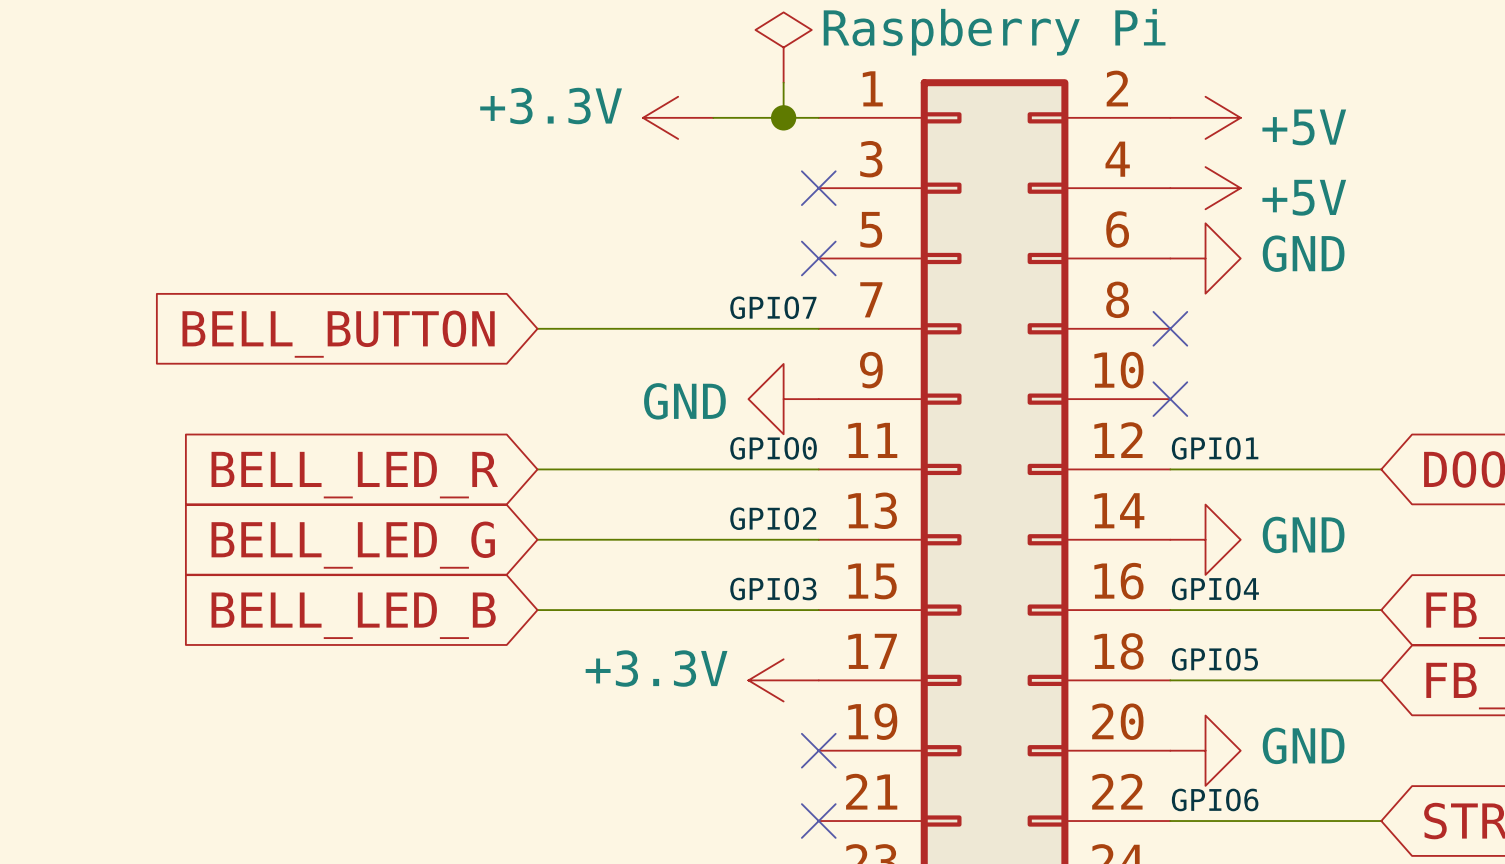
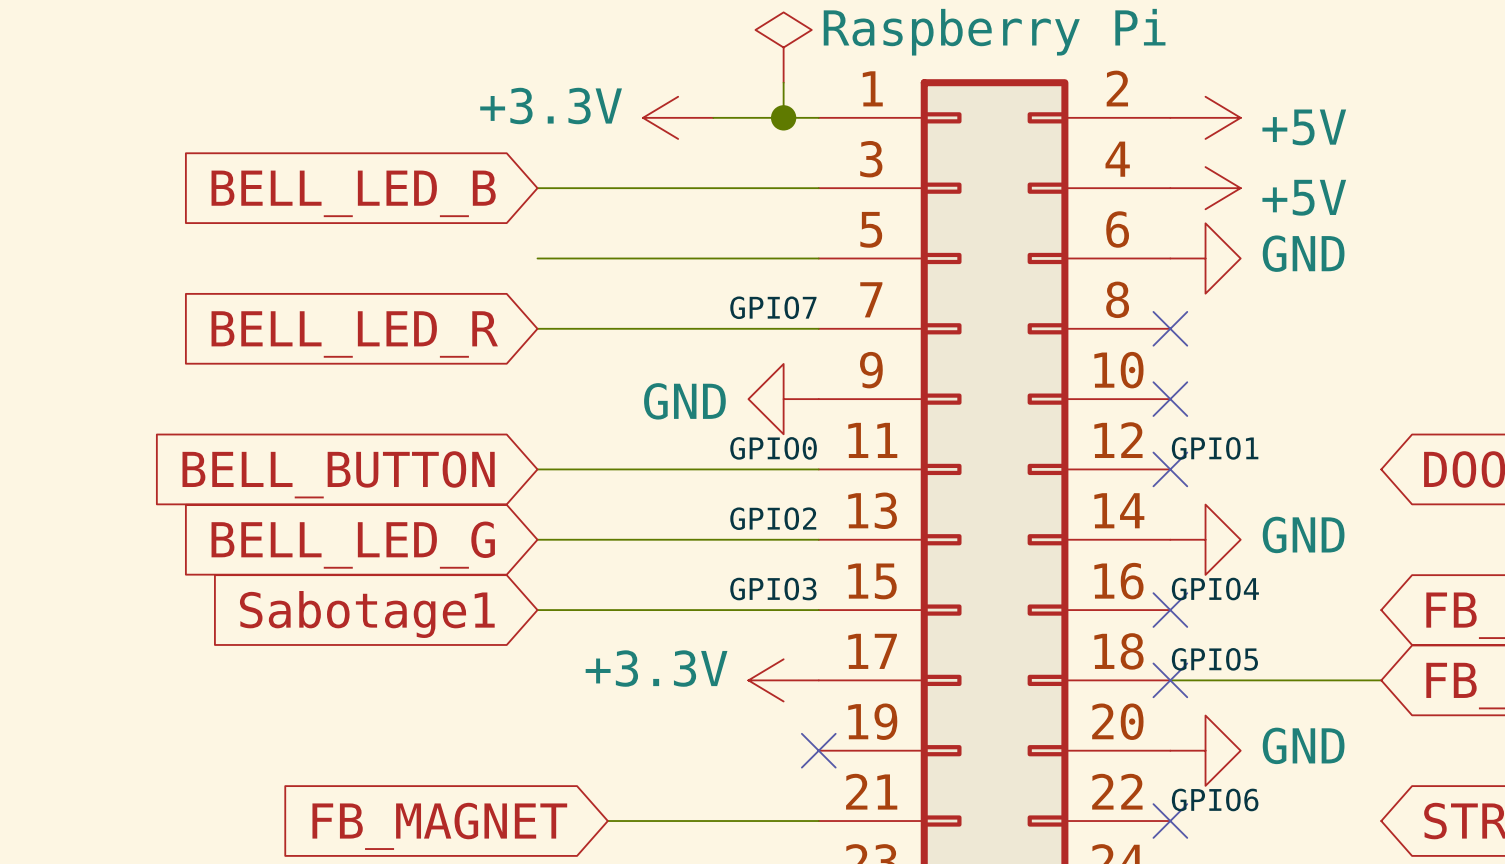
wire: none -> (537, 188) (818, 188)
no-connect mark: (818, 188) -> none
global label: none -> BELL_LED_B (353, 193)
wire: none -> (537, 258) (818, 258)
no-connect mark: (818, 258) -> none
global label: BELL_BUTTON (338, 334) -> BELL_LED_R (354, 334)
wire: (1170, 469) (1381, 469) -> none
no-connect mark: none -> (1170, 469)
global label: BELL_LED_R (354, 475) -> BELL_BUTTON (338, 474)
wire: (1170, 610) (1381, 610) -> none
no-connect mark: none -> (1170, 610)
global label: BELL_LED_B (353, 615) -> Sabotage1 (367, 614)
no-connect mark: none -> (1170, 680)
no-connect mark: (818, 821) -> none
wire: (1170, 821) (1381, 821) -> (607, 821) (818, 821)
no-connect mark: none -> (1170, 821)
global label: none -> FB_MAGNET (439, 826)

